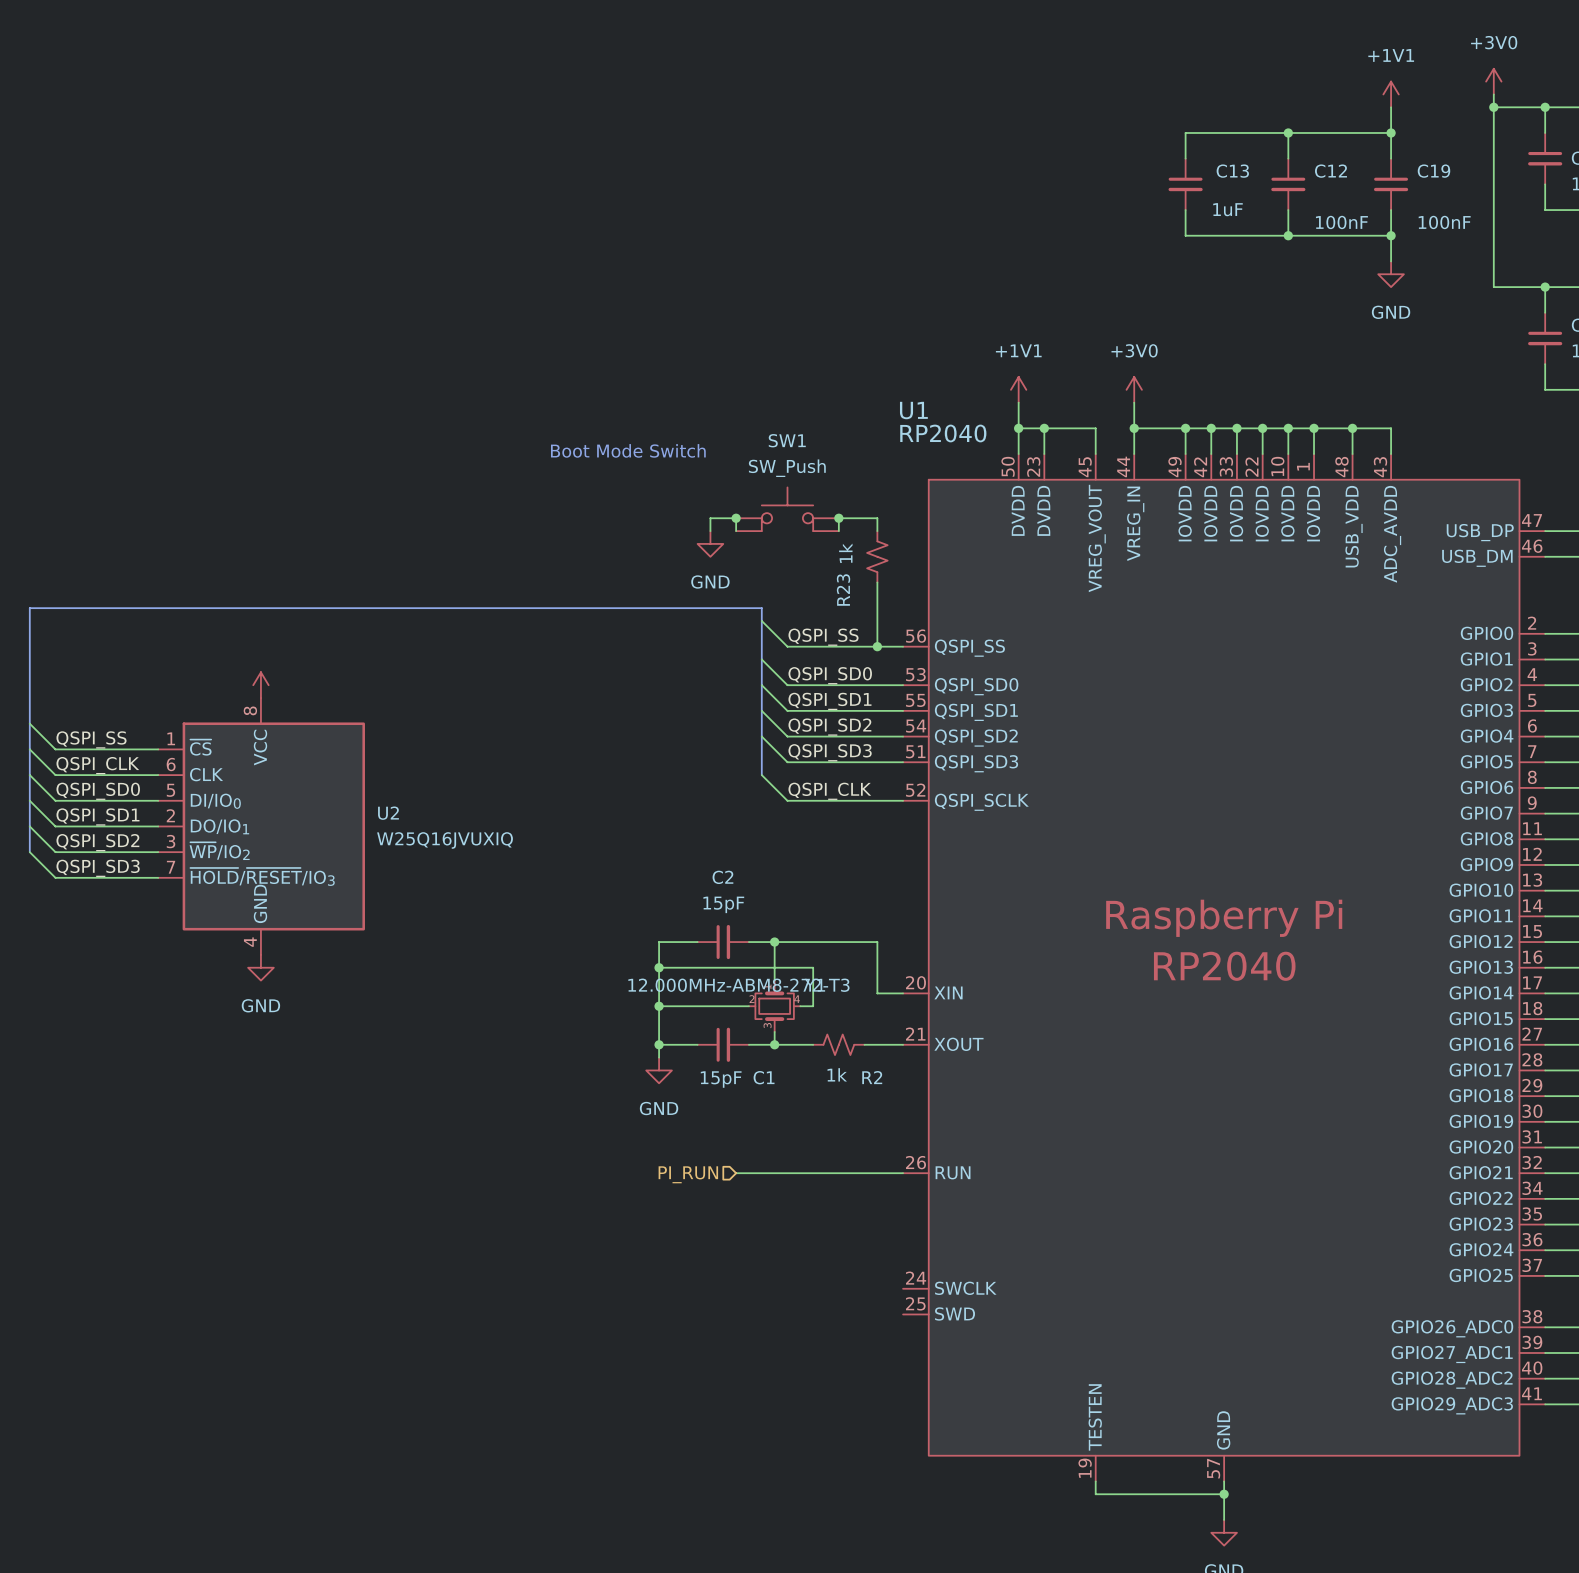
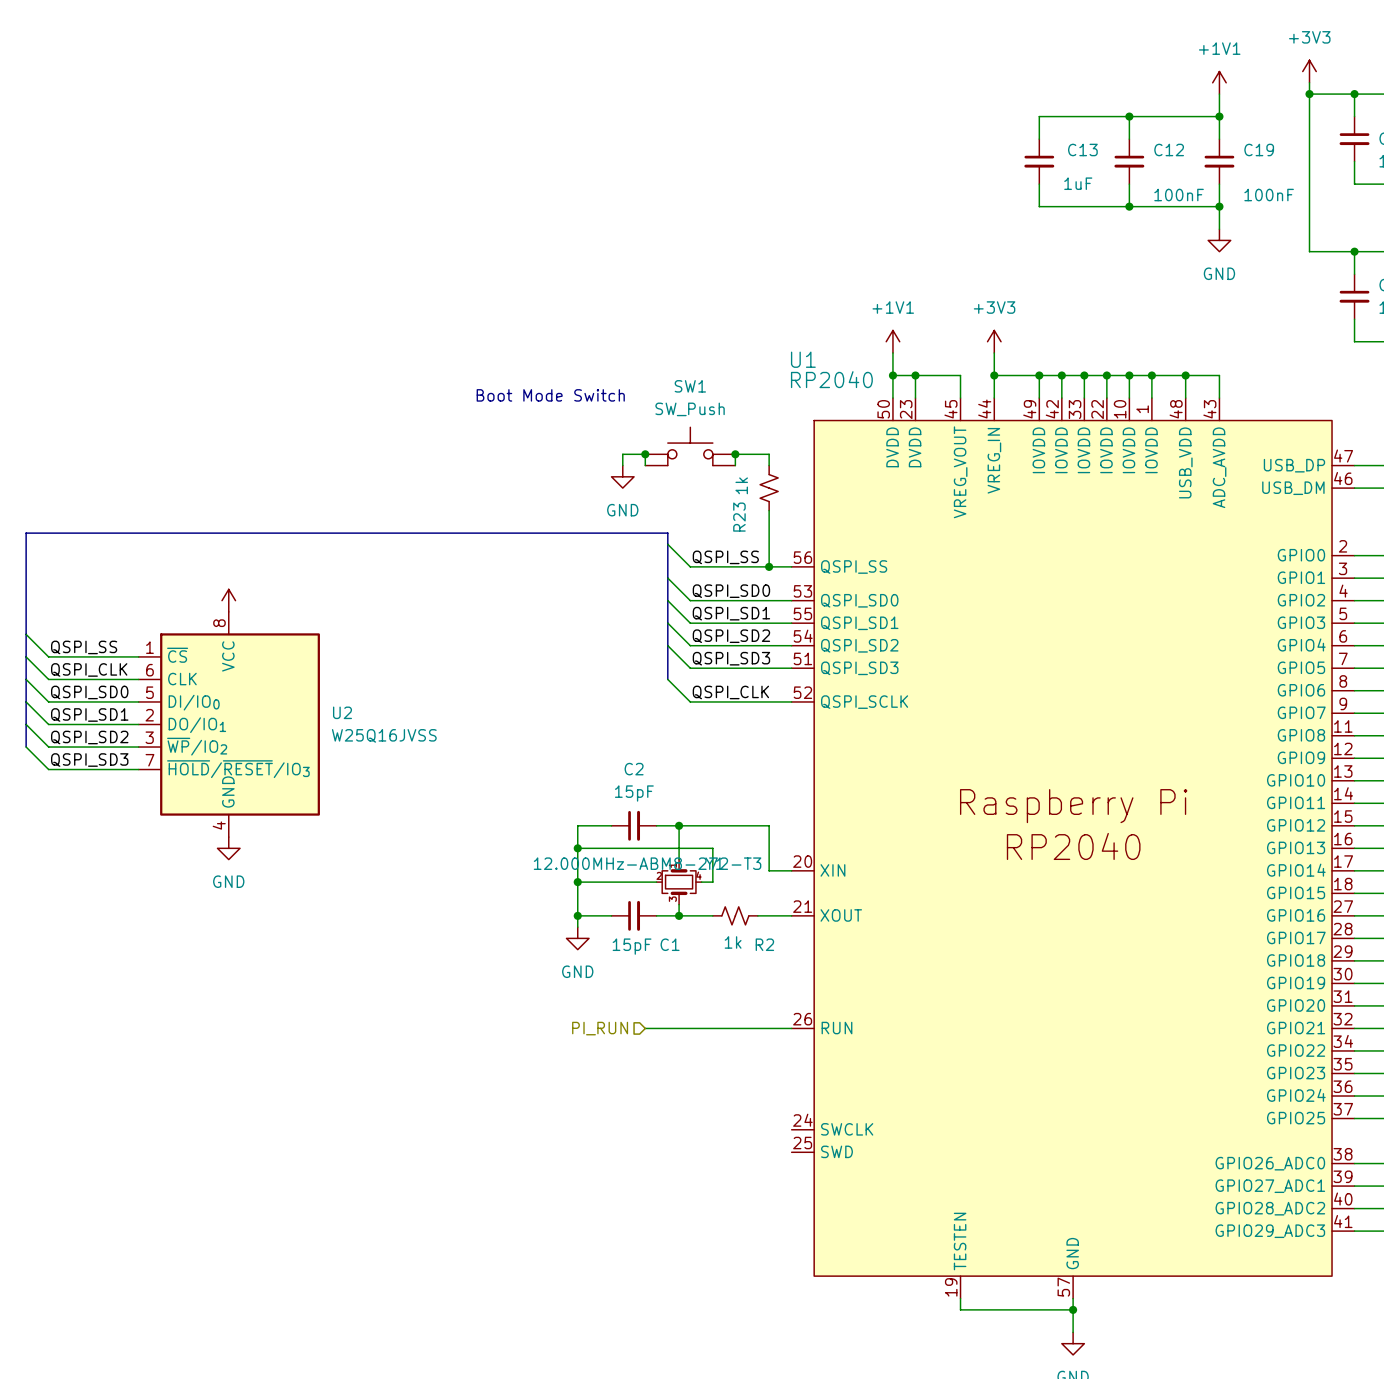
power symbol: +3V0 (1493, 81) -> +3V3 (1309, 71)
power symbol: +3V0 (1134, 389) -> +3V3 (994, 341)
U2 value: W25Q16JVUXIQ (445, 840) -> W25Q16JVSS (384, 735)

